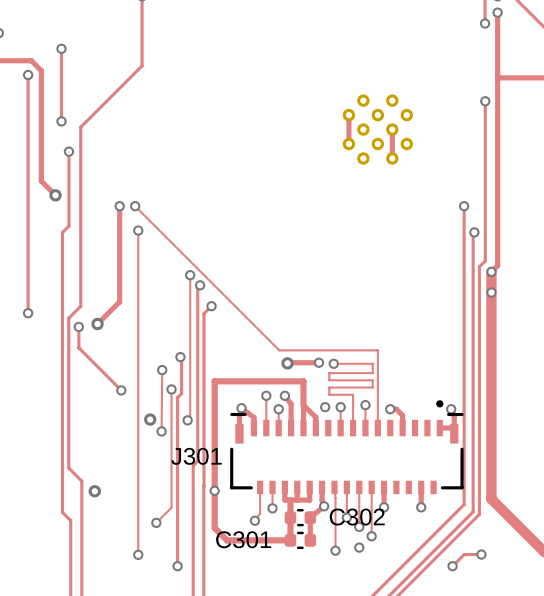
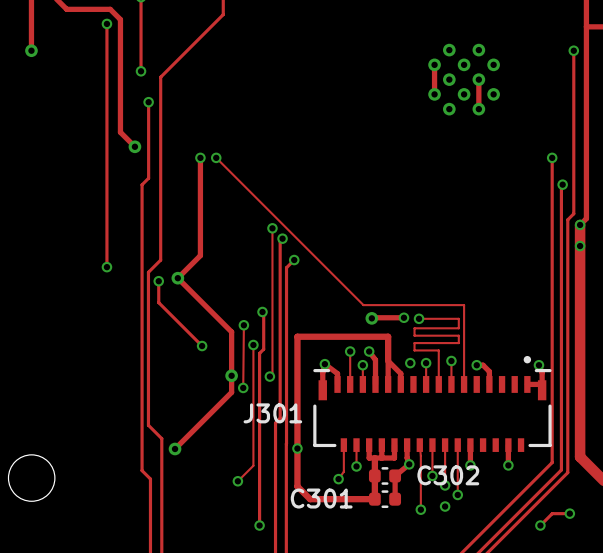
track: (138, 230) (138, 554) -> none
via: (138, 230) -> none
track: none -> (177, 278) (231, 331) (231, 392) (175, 448)
via: (138, 554) -> none

